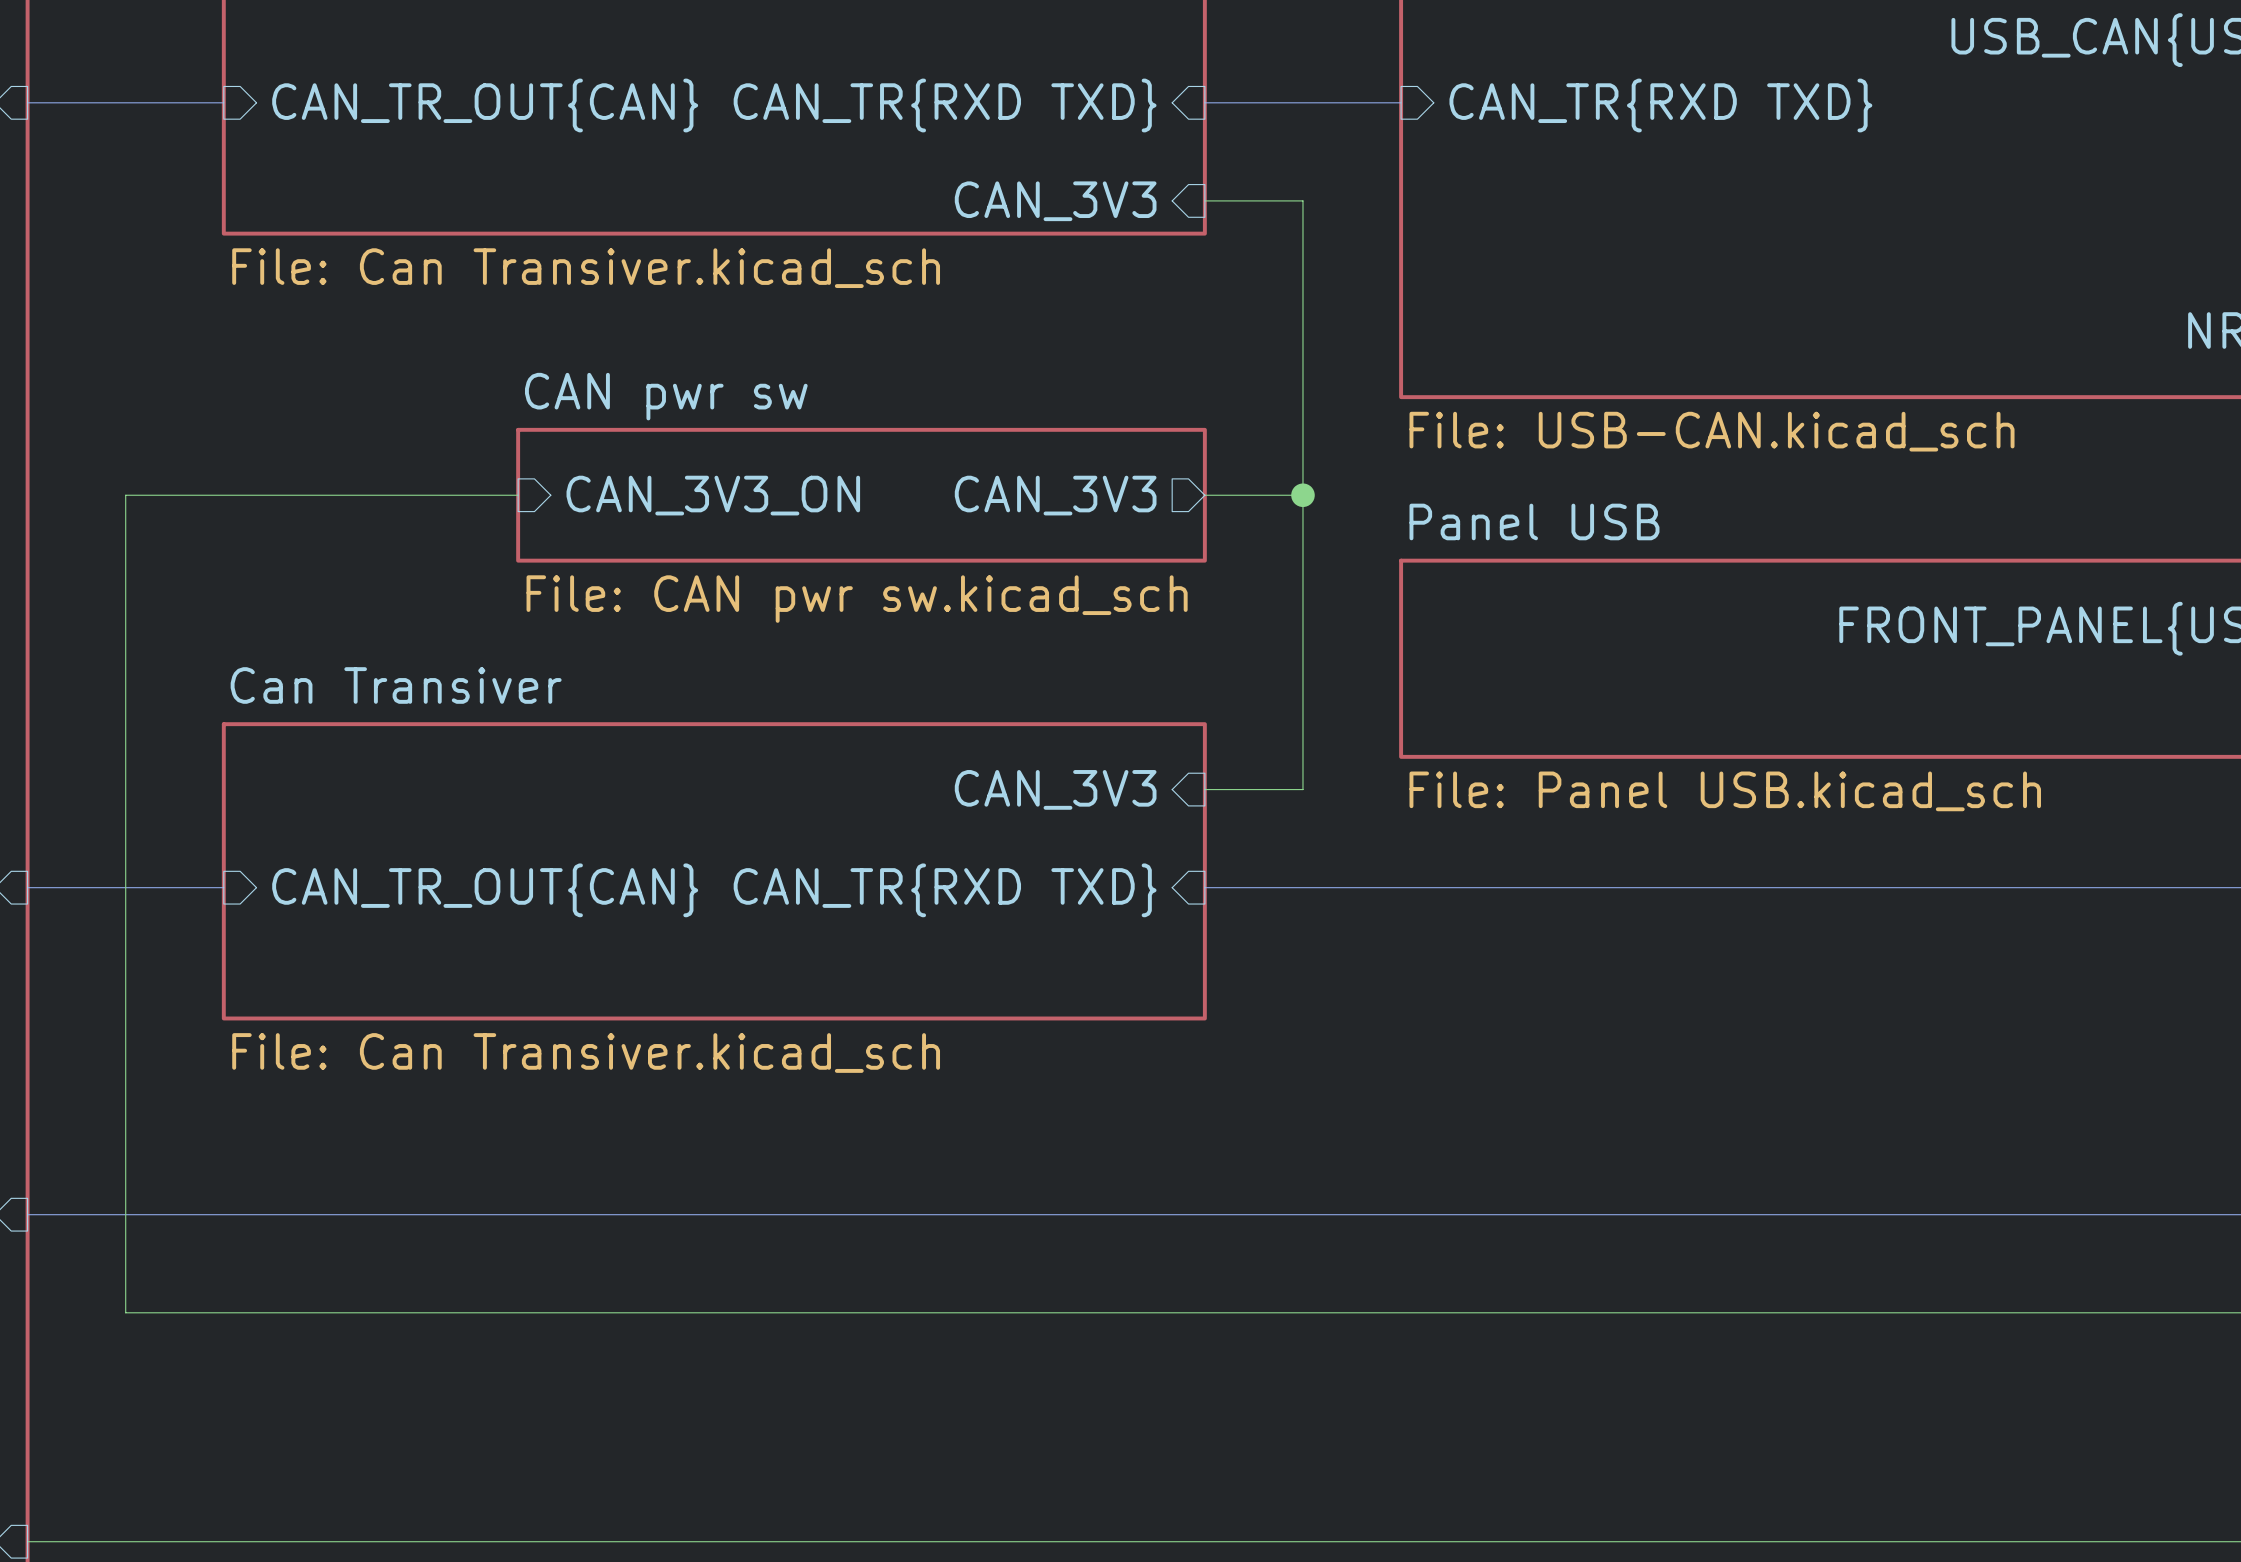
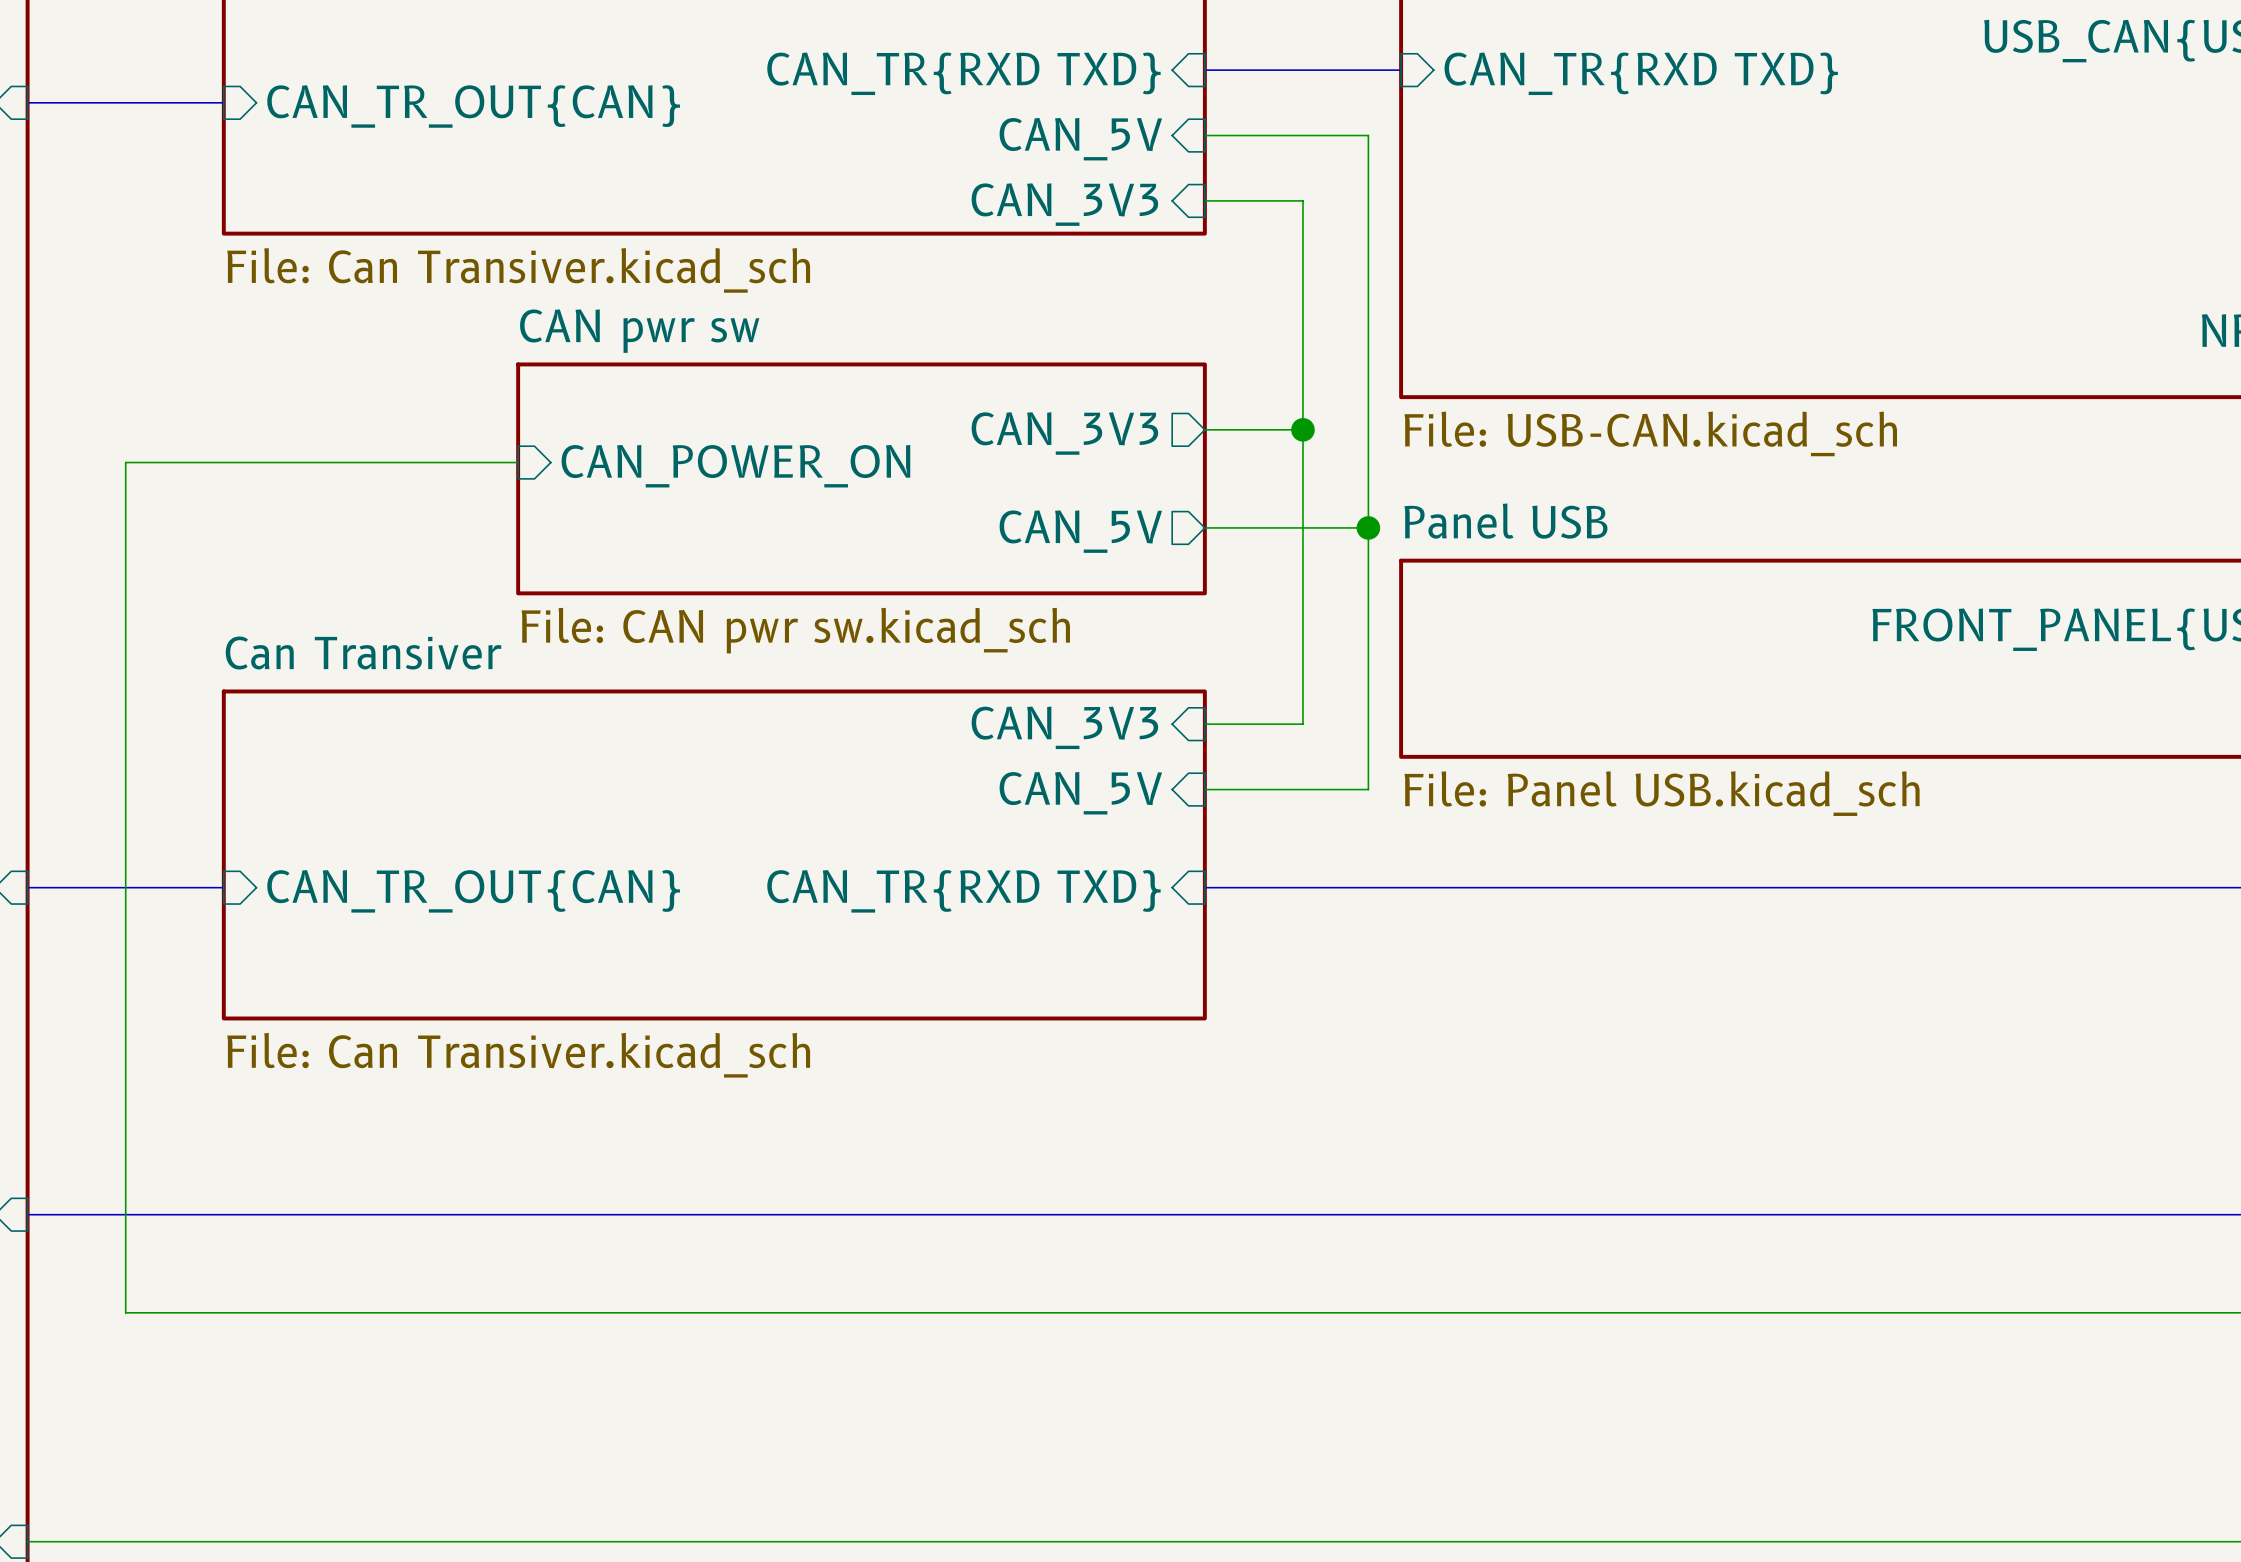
bus: (1204, 102) (1401, 102) -> (1204, 70) (1401, 70)
sheet pin position: CAN_TR{RXD TXD} (945, 105) -> CAN_TR{RXD TXD} (963, 73)
sheet pin position: CAN_TR{RXD TXD} (1660, 105) -> CAN_TR{RXD TXD} (1641, 73)
sheet pin: none -> CAN_5V (1080, 139)
wire: none -> (1204, 135) (1368, 135) (1368, 789) (1302, 789)
sheet CAN pwr sw shape: [516, 427, 1207, 563] -> [516, 362, 1207, 596]
junction: none -> (1302, 429)
wire: (125, 495) (518, 495) -> (125, 495) (125, 462) (518, 462)
sheet pin: CAN_3V3_ON (713, 495) -> CAN_POWER_ON (735, 466)
sheet pin position: CAN_3V3 (1055, 495) -> CAN_3V3 (1064, 433)
wire: (1204, 495) (1302, 495) -> (1204, 429) (1302, 429)
junction: (1302, 495) -> none
wire: none -> (1204, 527) (1368, 527)
junction: none -> (1368, 527)
sheet pin: none -> CAN_5V (1080, 531)
sheet Can Transiver shape: [221, 722, 1207, 1021] -> [221, 689, 1207, 1021]
sheet pin: none -> CAN_3V3 (1064, 727)
wire: (1302, 724) (1302, 789) -> (1302, 724) (1204, 724)
sheet pin: CAN_3V3 (1055, 789) -> CAN_5V (1080, 793)

